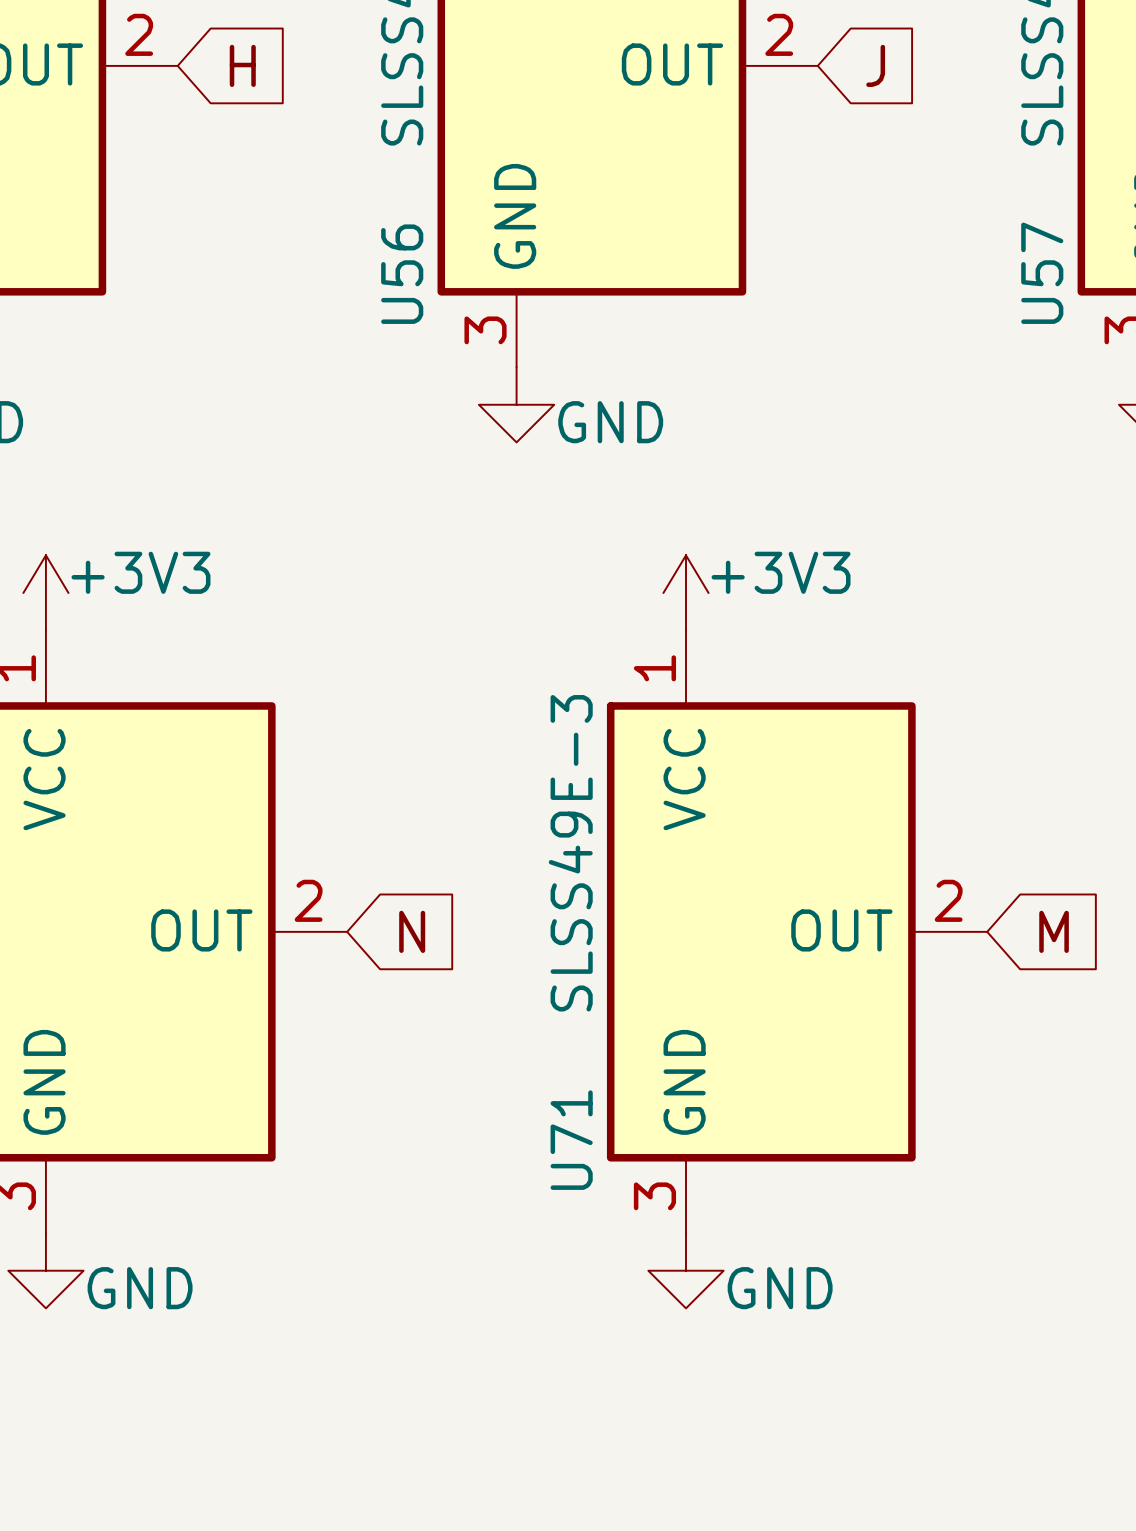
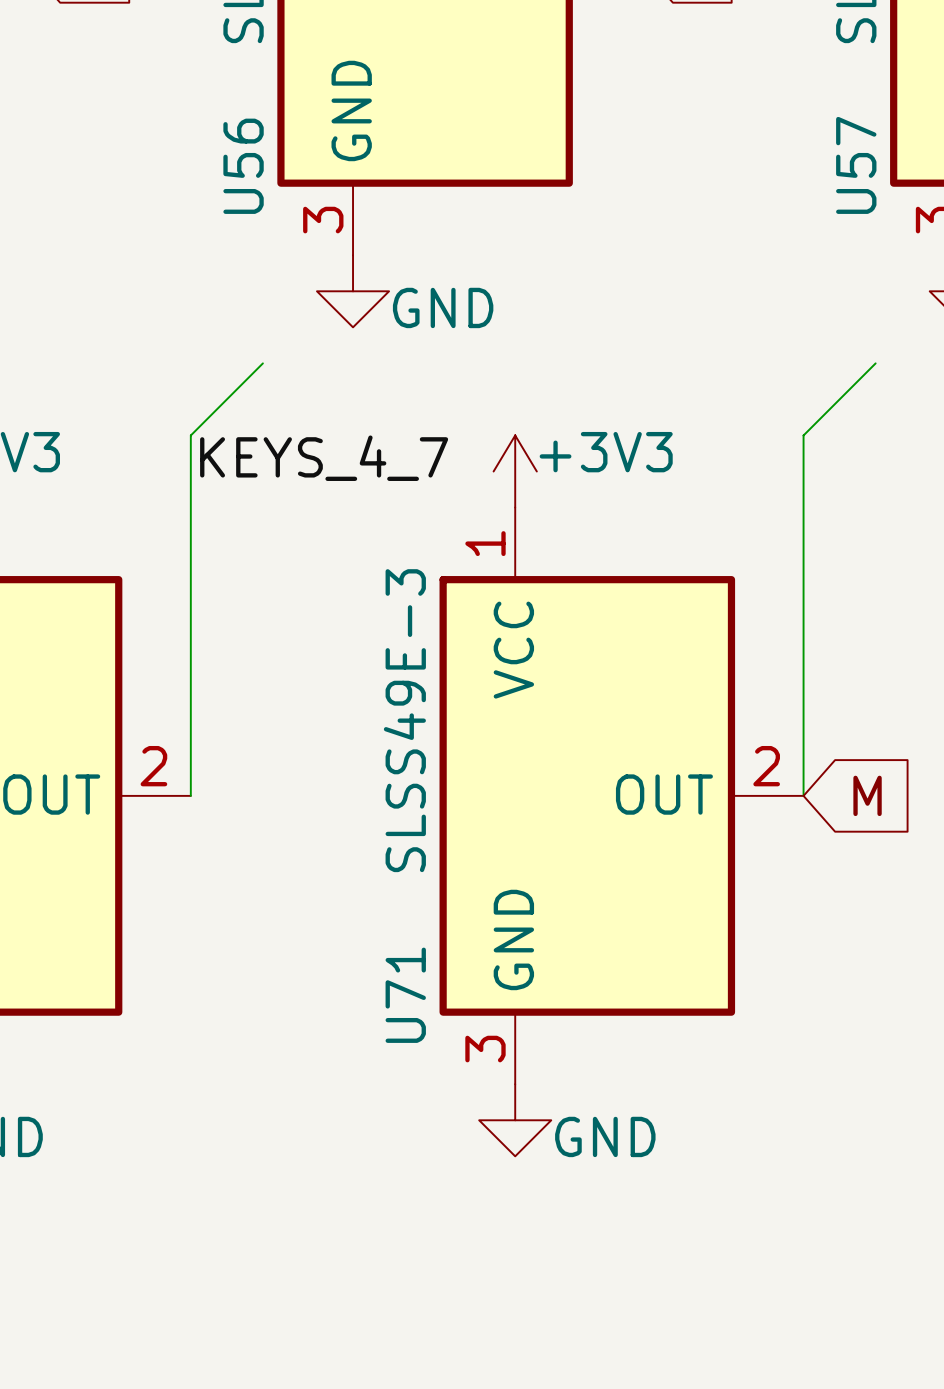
wire: none -> (262, 363) (190, 435) (190, 795)
wire: none -> (875, 363) (803, 435) (803, 795)
label: none -> KEYS_4_7 (324, 458)
global label: N (412, 931) -> none

